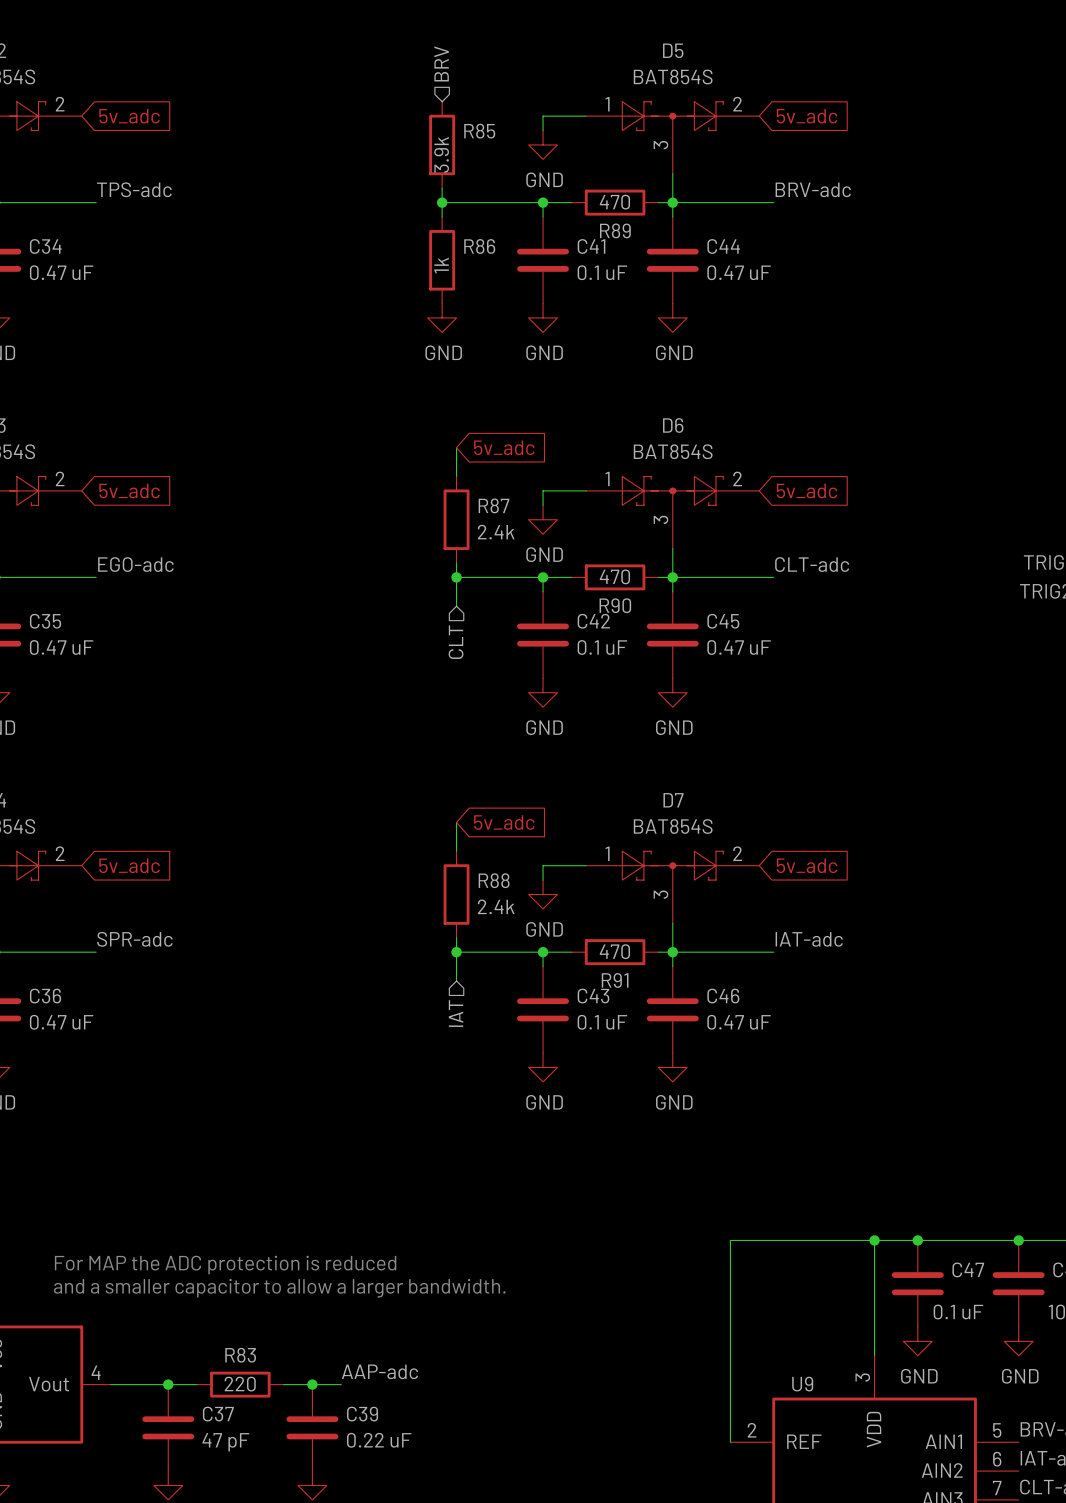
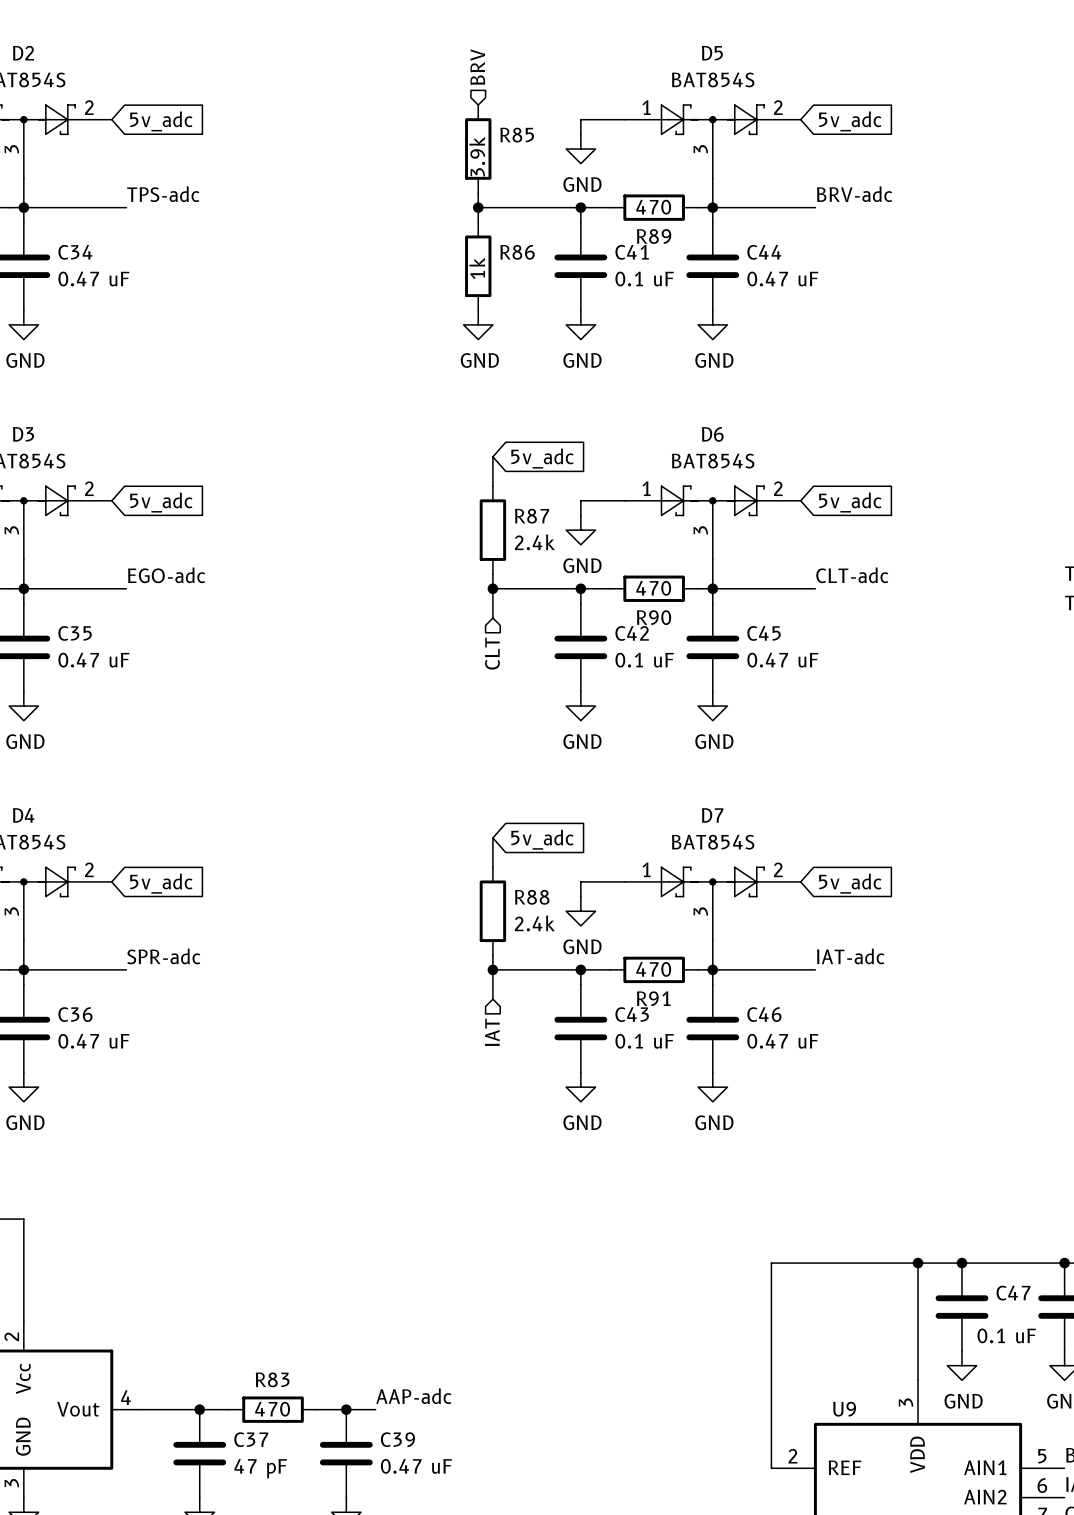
text: For MAP the ADC protection is reduced (225, 1265) -> none
text: and a smaller capacitor to allow a larger bandwidth. (279, 1288) -> none
R83 value: 220 (240, 1384) -> 470 (272, 1409)
C39 value: 0.22 uF (379, 1440) -> 0.47 uF (416, 1466)

